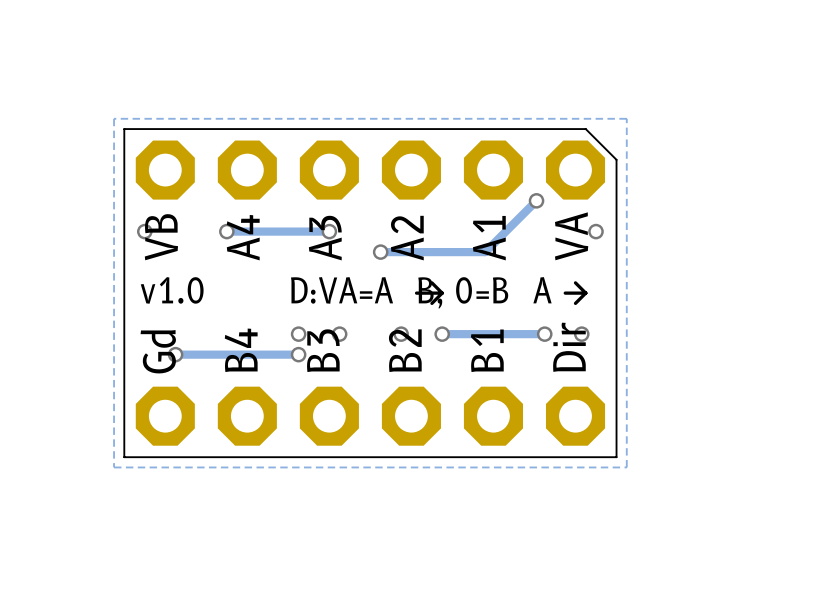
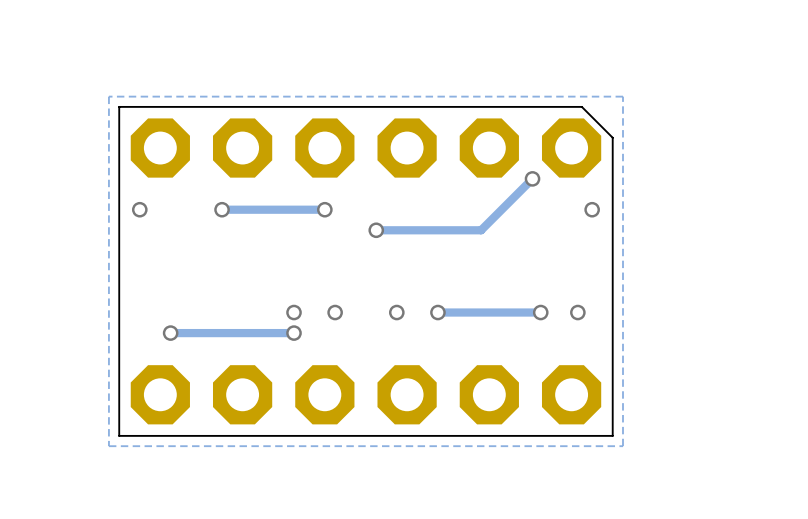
text: VA (571, 236) -> none
text: VB (161, 237) -> none
text: A4 (243, 237) -> none
text: A3 (325, 238) -> none
text: A2 (407, 238) -> none
text: A1 (489, 238) -> none
line: (431, 282) (442, 293) -> none
line: (575, 282) (585, 293) -> none
text: v1.0 (172, 290) -> none
text: D:VA=A B, 0=B A (421, 292) -> none
line: (442, 293) (416, 293) -> none
line: (442, 293) (431, 303) -> none
line: (585, 293) (565, 293) -> none
line: (585, 293) (575, 303) -> none
text: Dir (569, 347) -> none
text: B4 (241, 350) -> none
text: B3 (323, 350) -> none
text: B2 (405, 350) -> none
text: B1 (487, 350) -> none
text: Gd (158, 351) -> none

